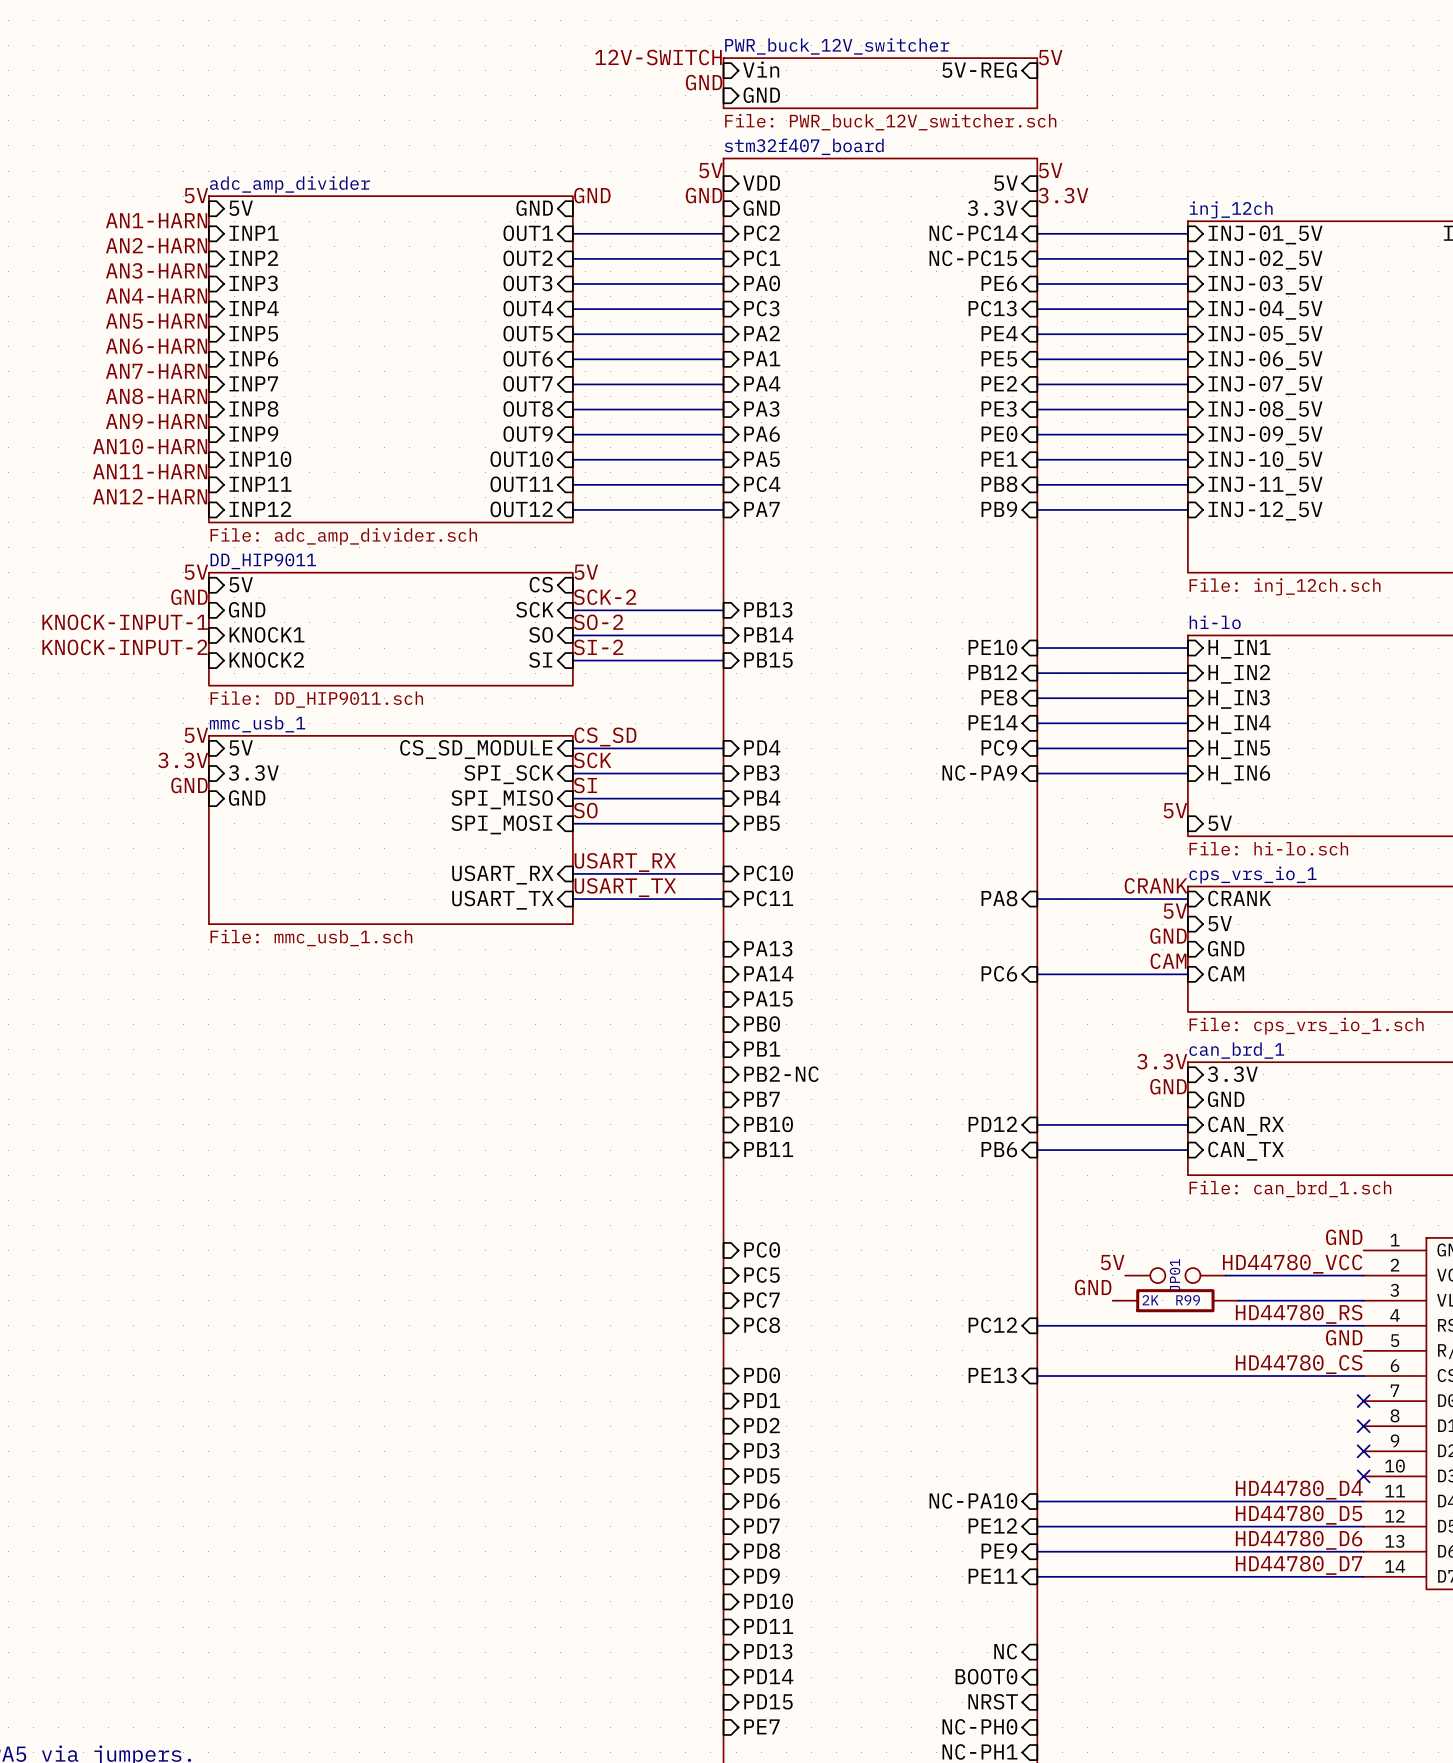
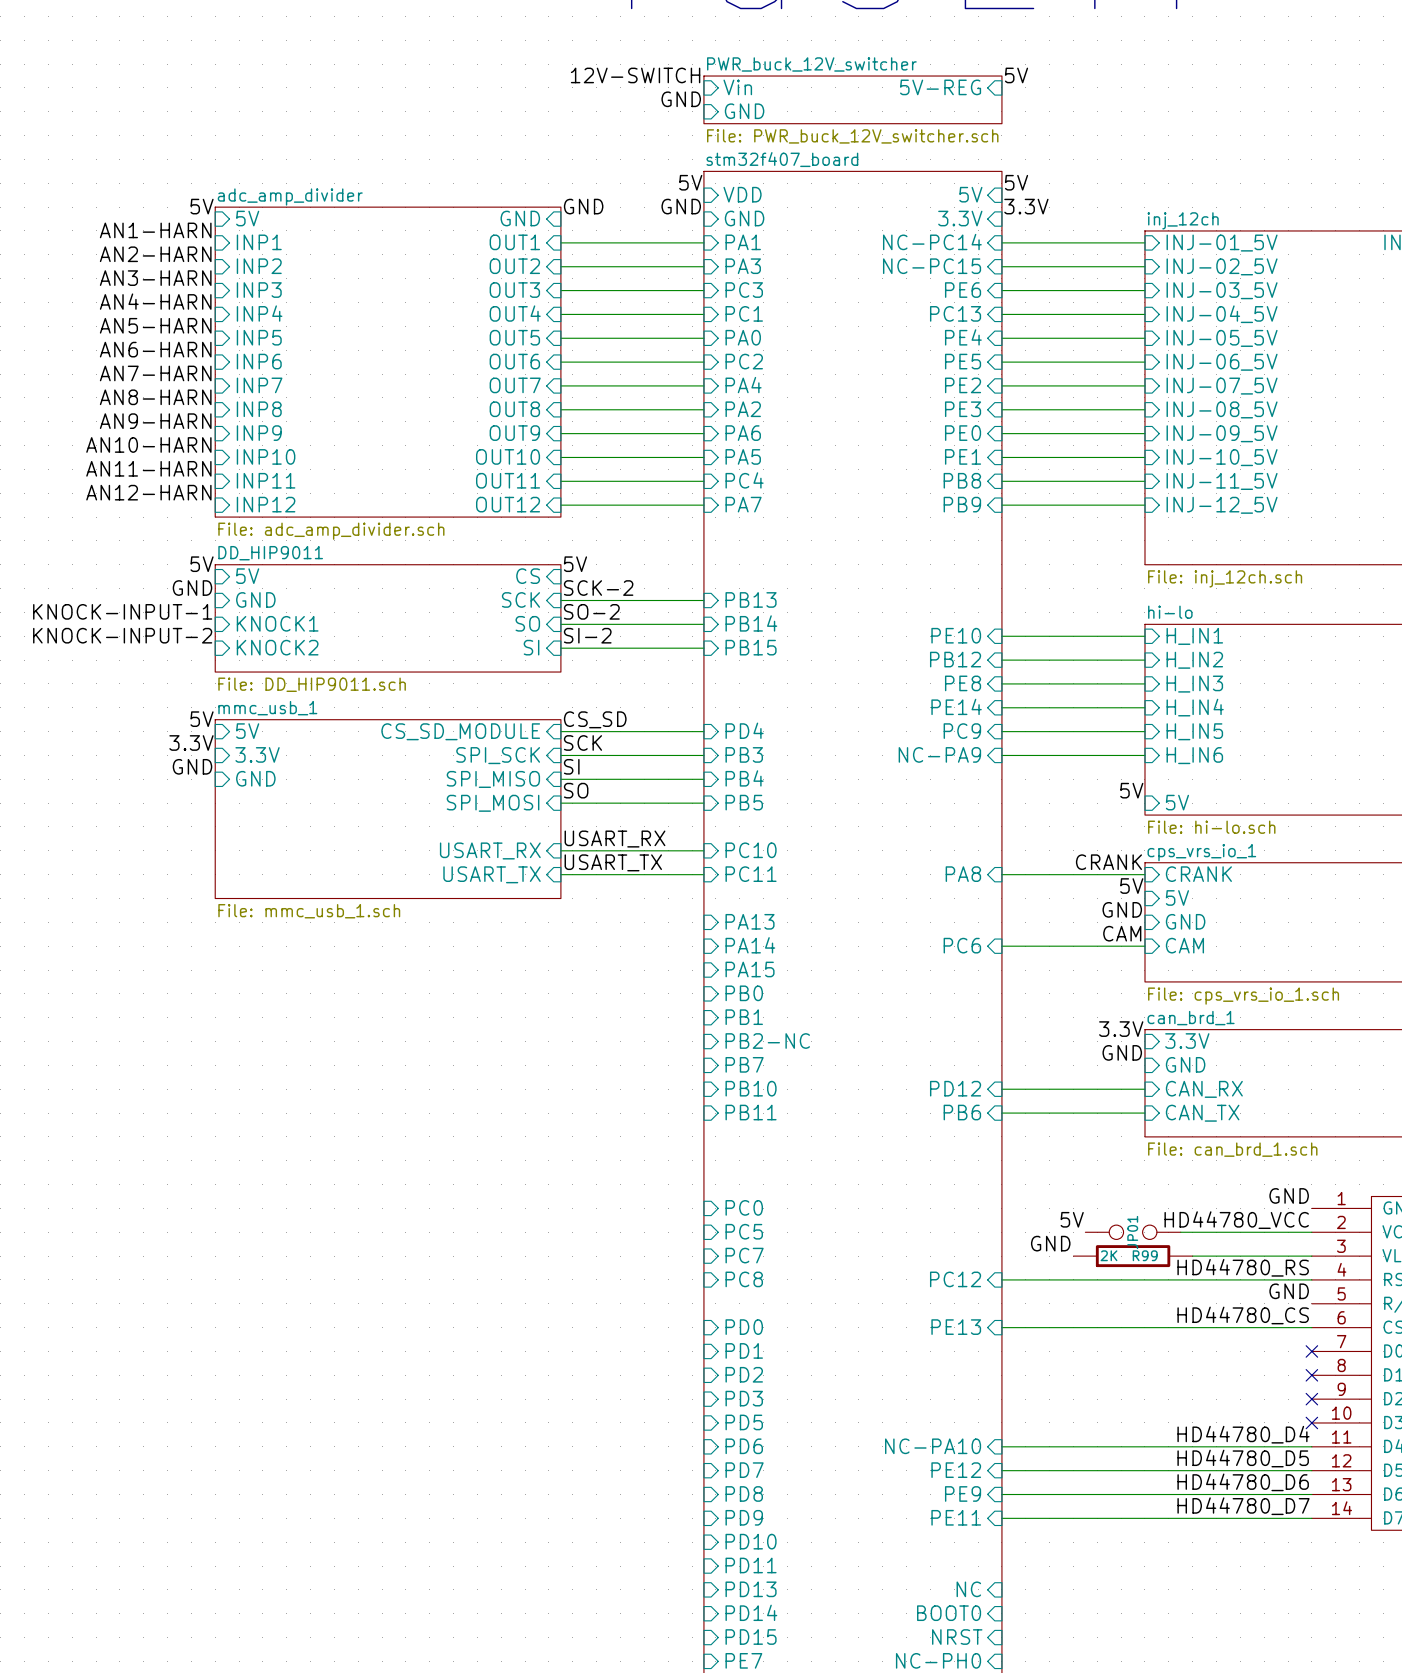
sheet pin: PC2 (762, 233) -> PA1 (743, 242)
sheet pin: PC1 (762, 258) -> PA3 (743, 266)
sheet pin: PA0 (762, 283) -> PC3 (744, 290)
sheet pin: PC3 (761, 308) -> PC1 (744, 313)
sheet pin: PA2 (762, 333) -> PA0 (743, 337)
sheet pin: PA1 (762, 358) -> PC2 (744, 361)
sheet pin: PA3 (761, 408) -> PA2 (743, 409)

